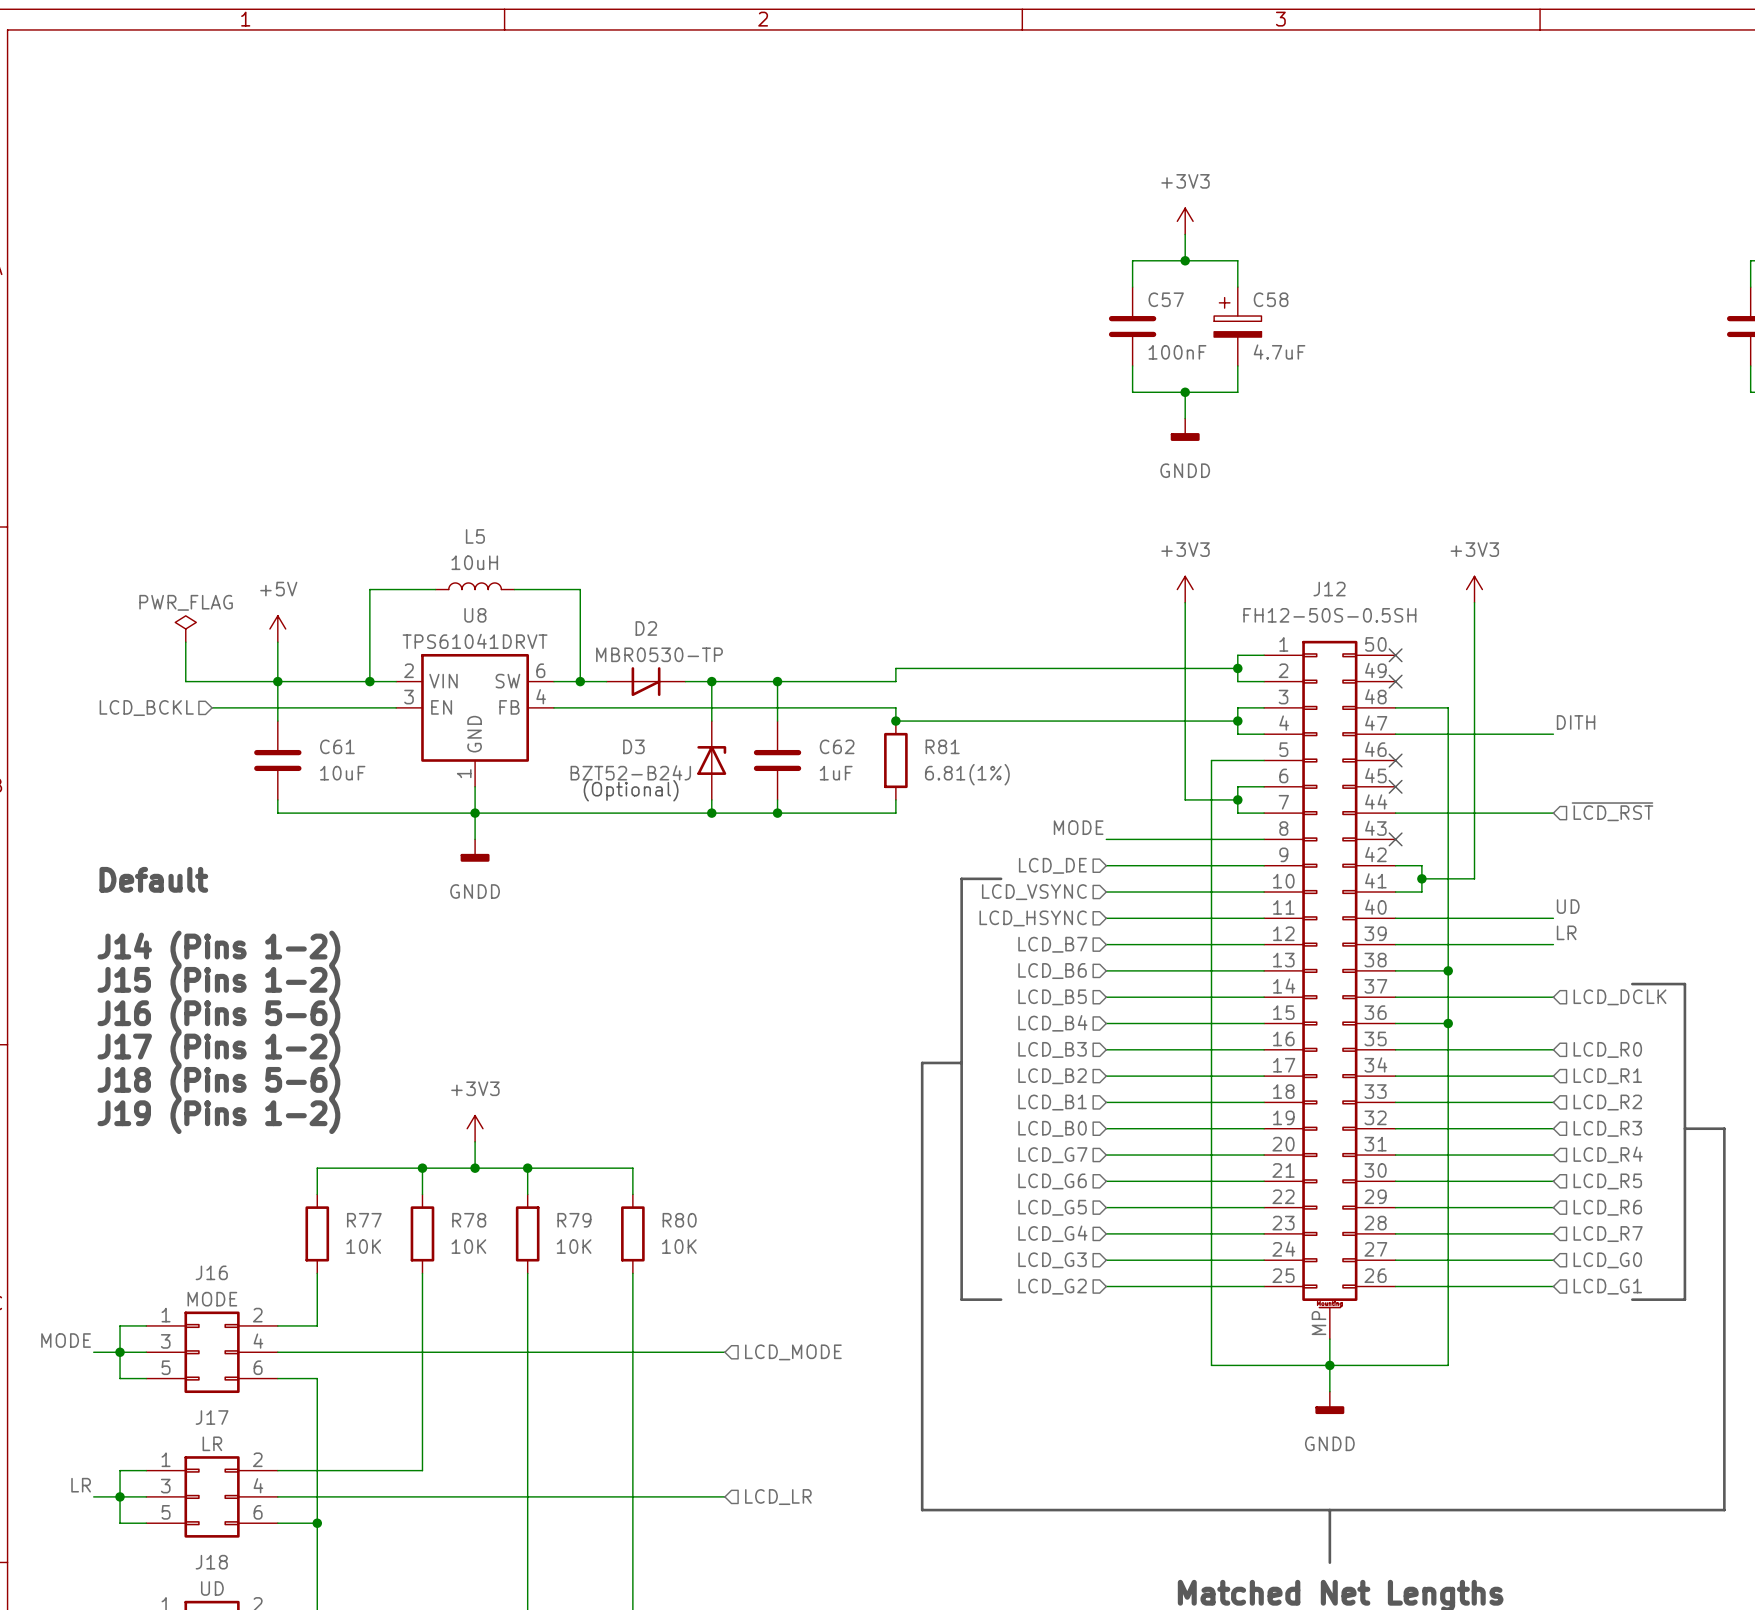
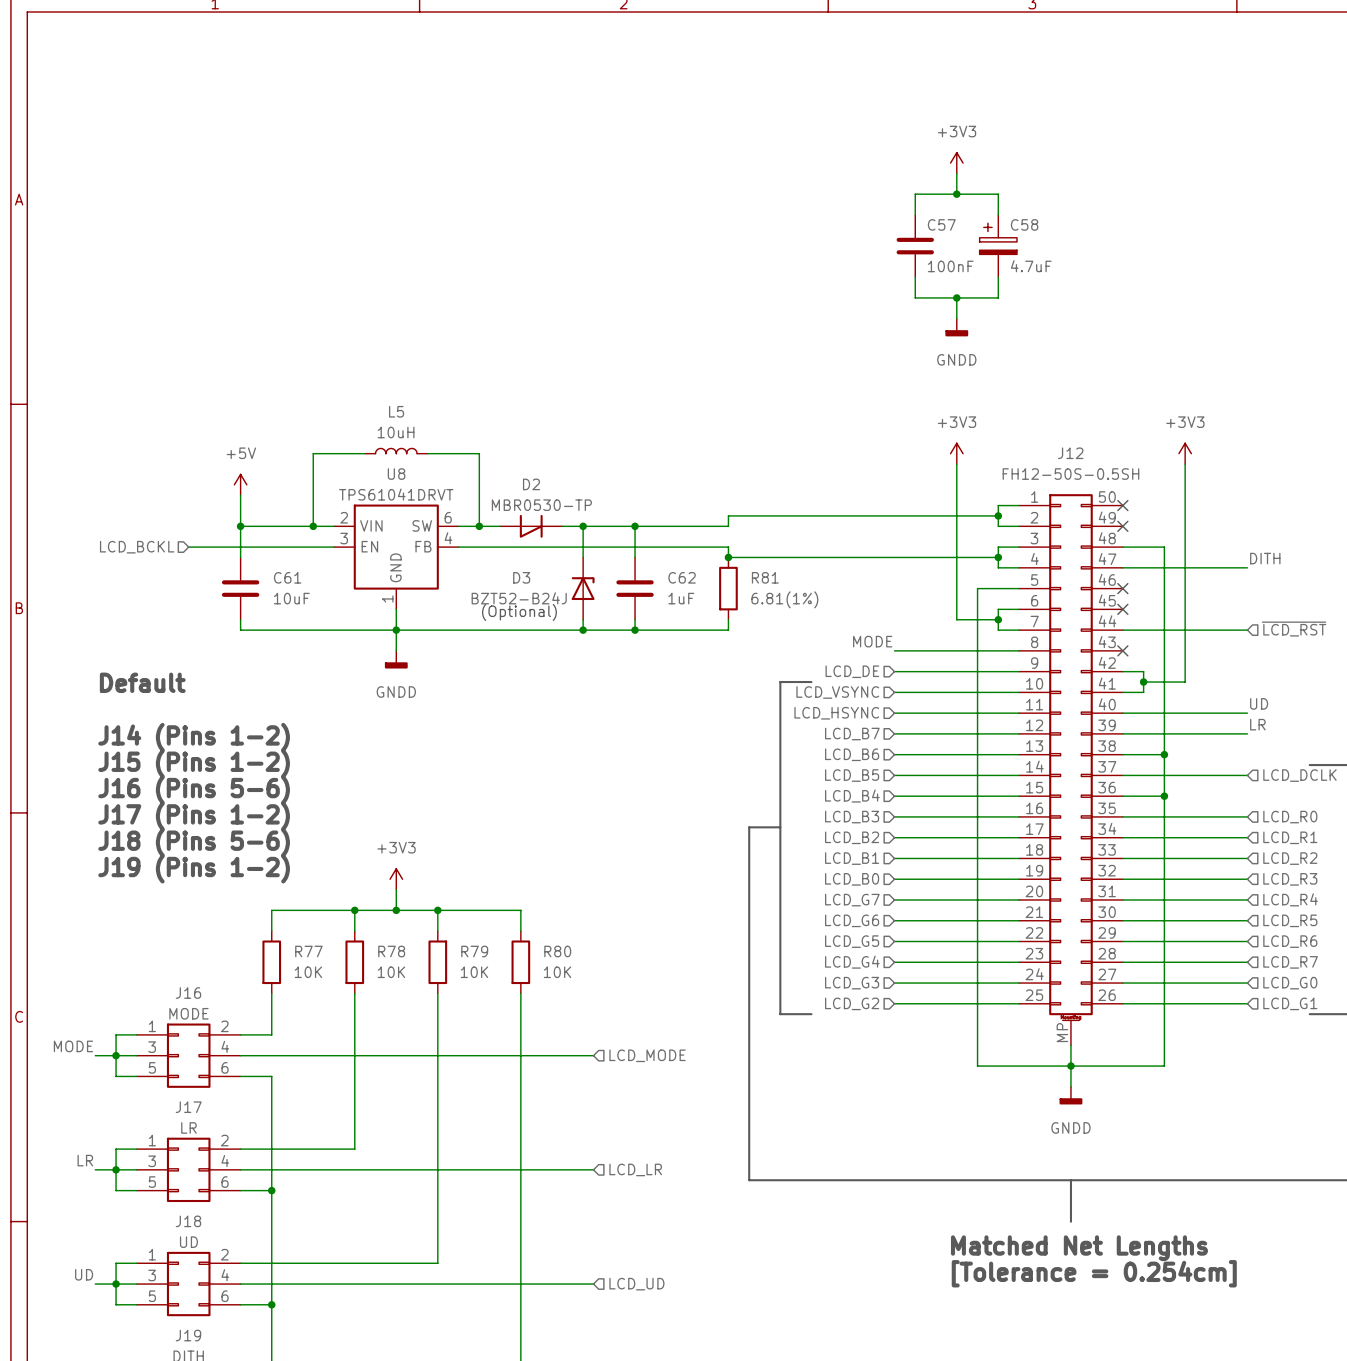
power symbol: PWR_FLAG (185, 628) -> none
wire: (185, 642) (185, 681) (277, 681) -> none

